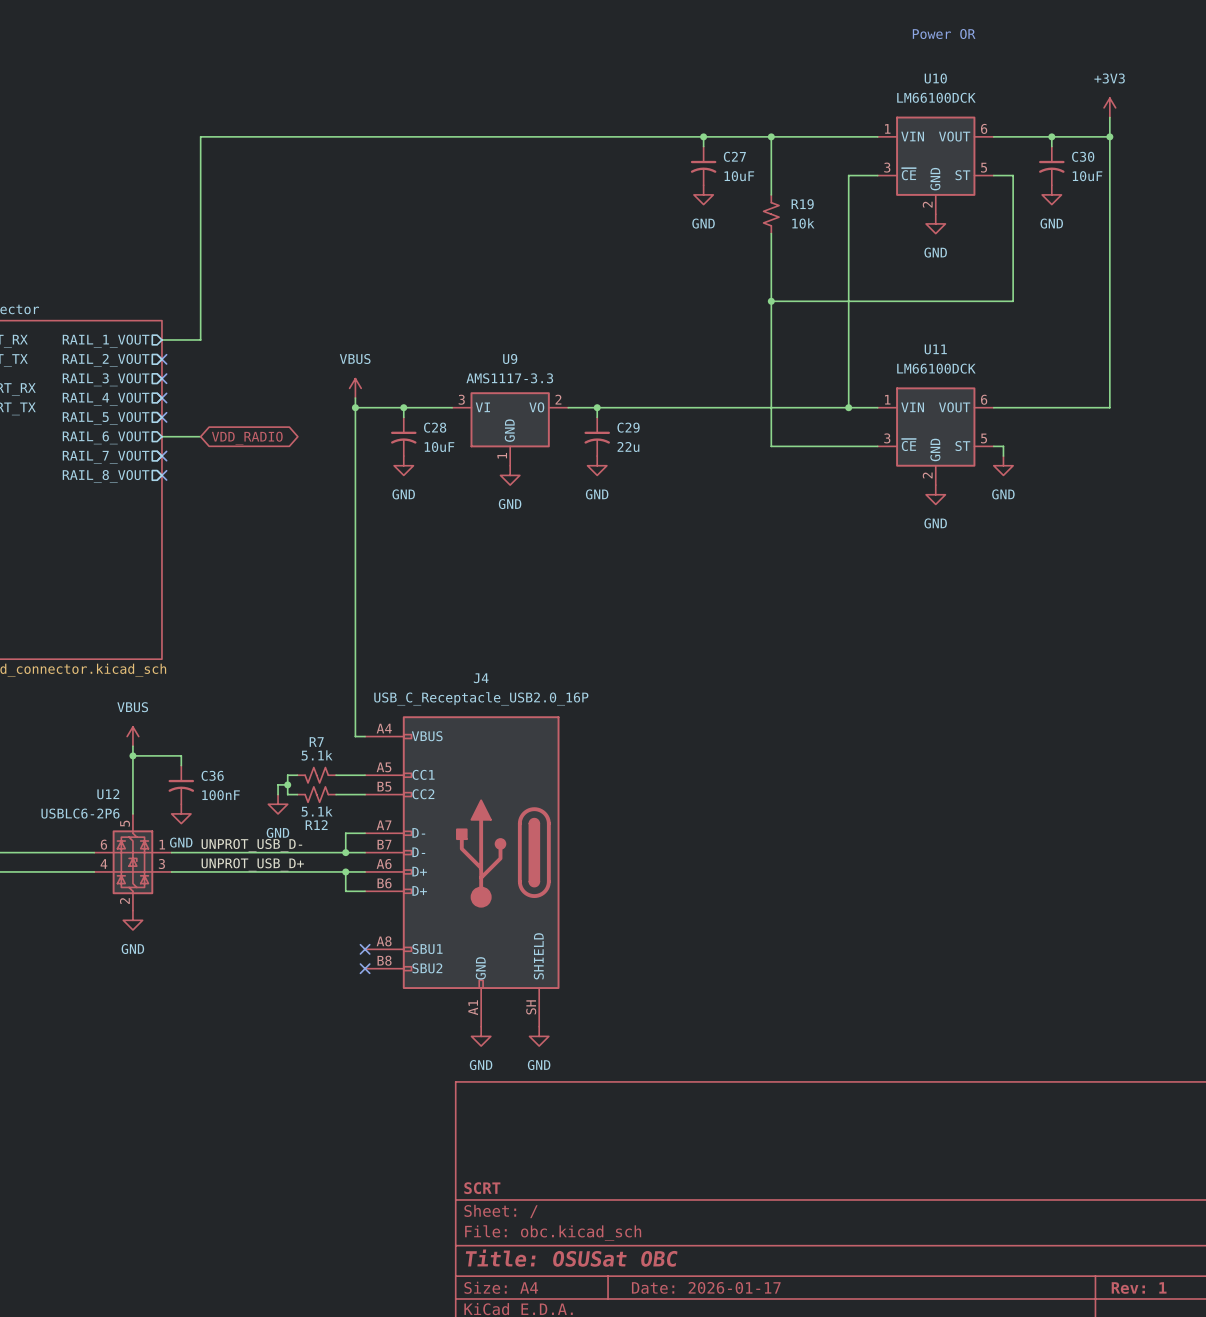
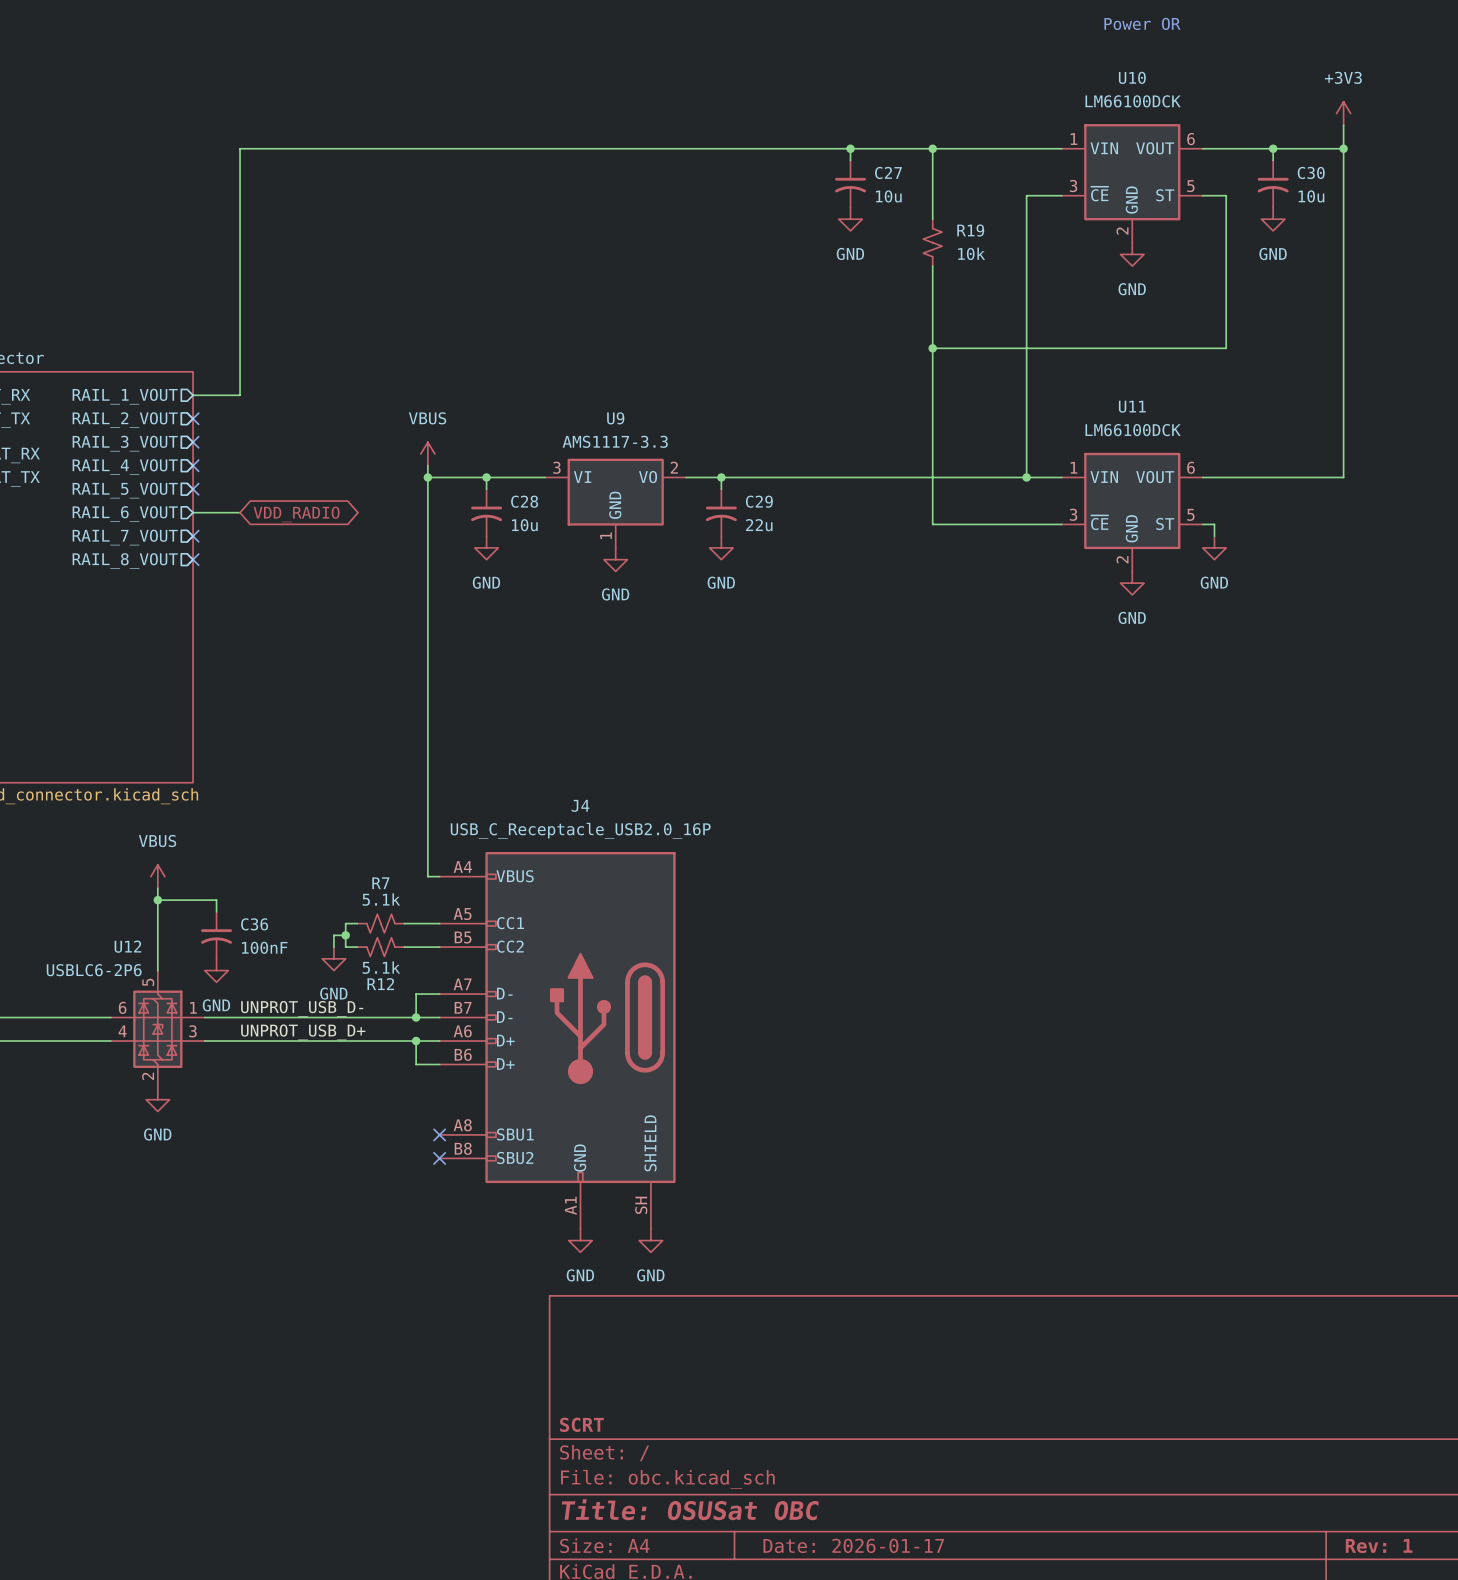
C27 value: 10uF (739, 176) -> 10u (888, 196)
C30 value: 10uF (1087, 176) -> 10u (1311, 196)
C28 value: 10uF (439, 447) -> 10u (524, 525)

